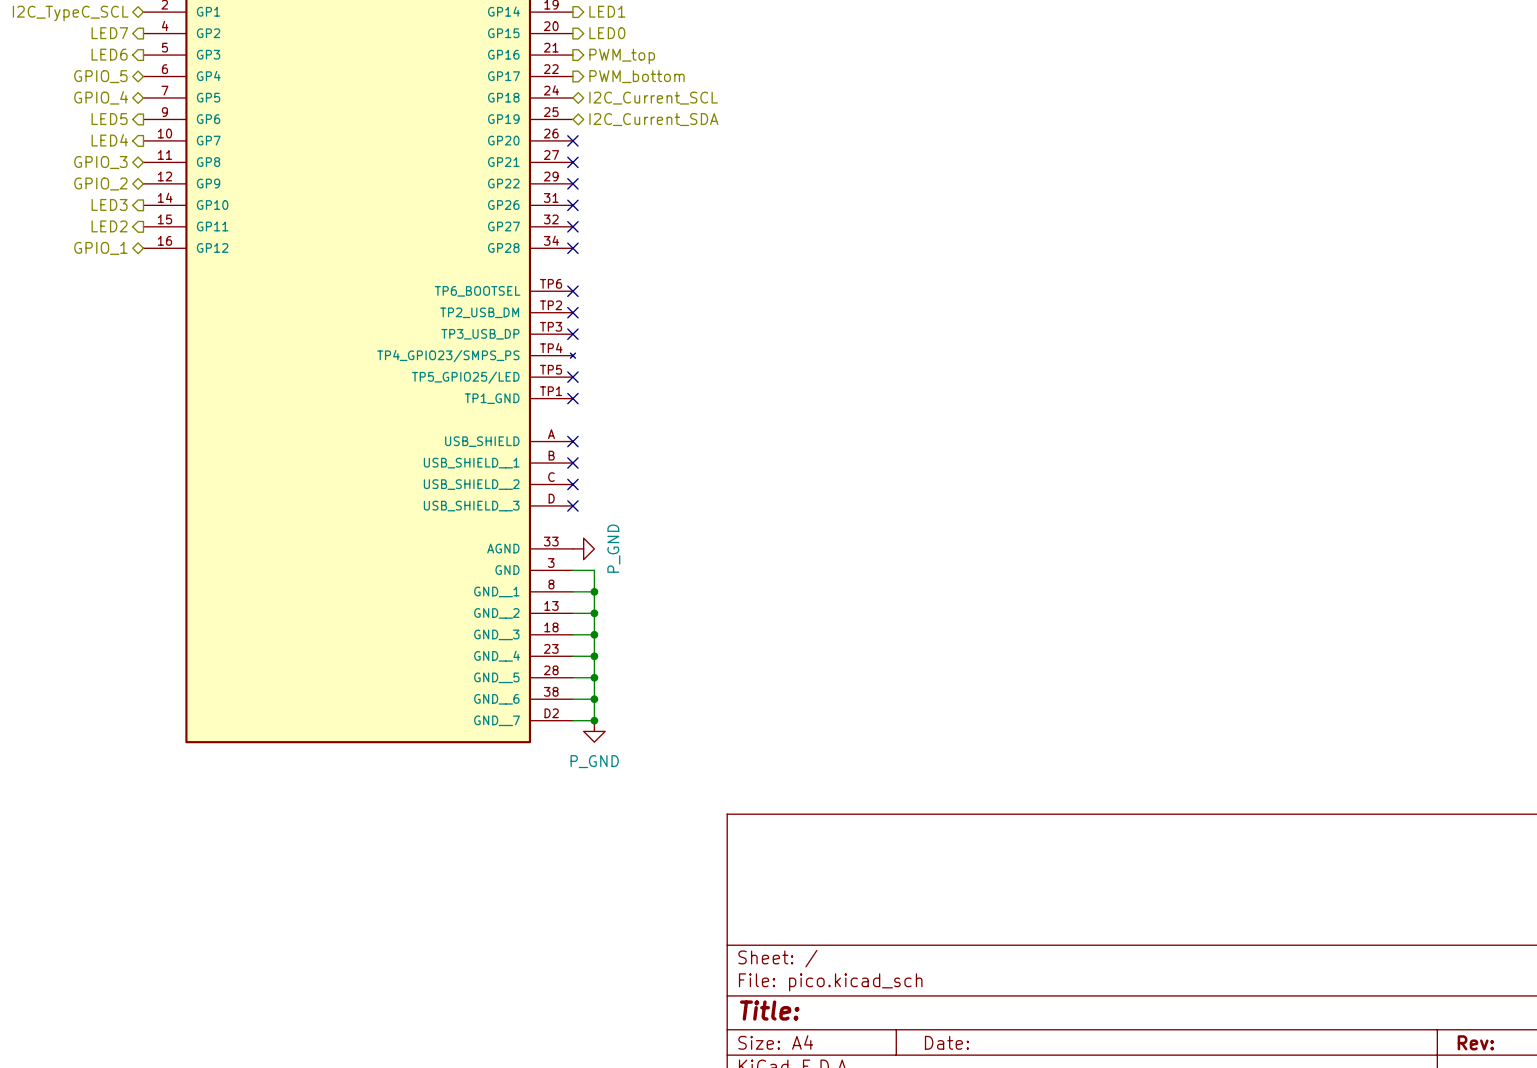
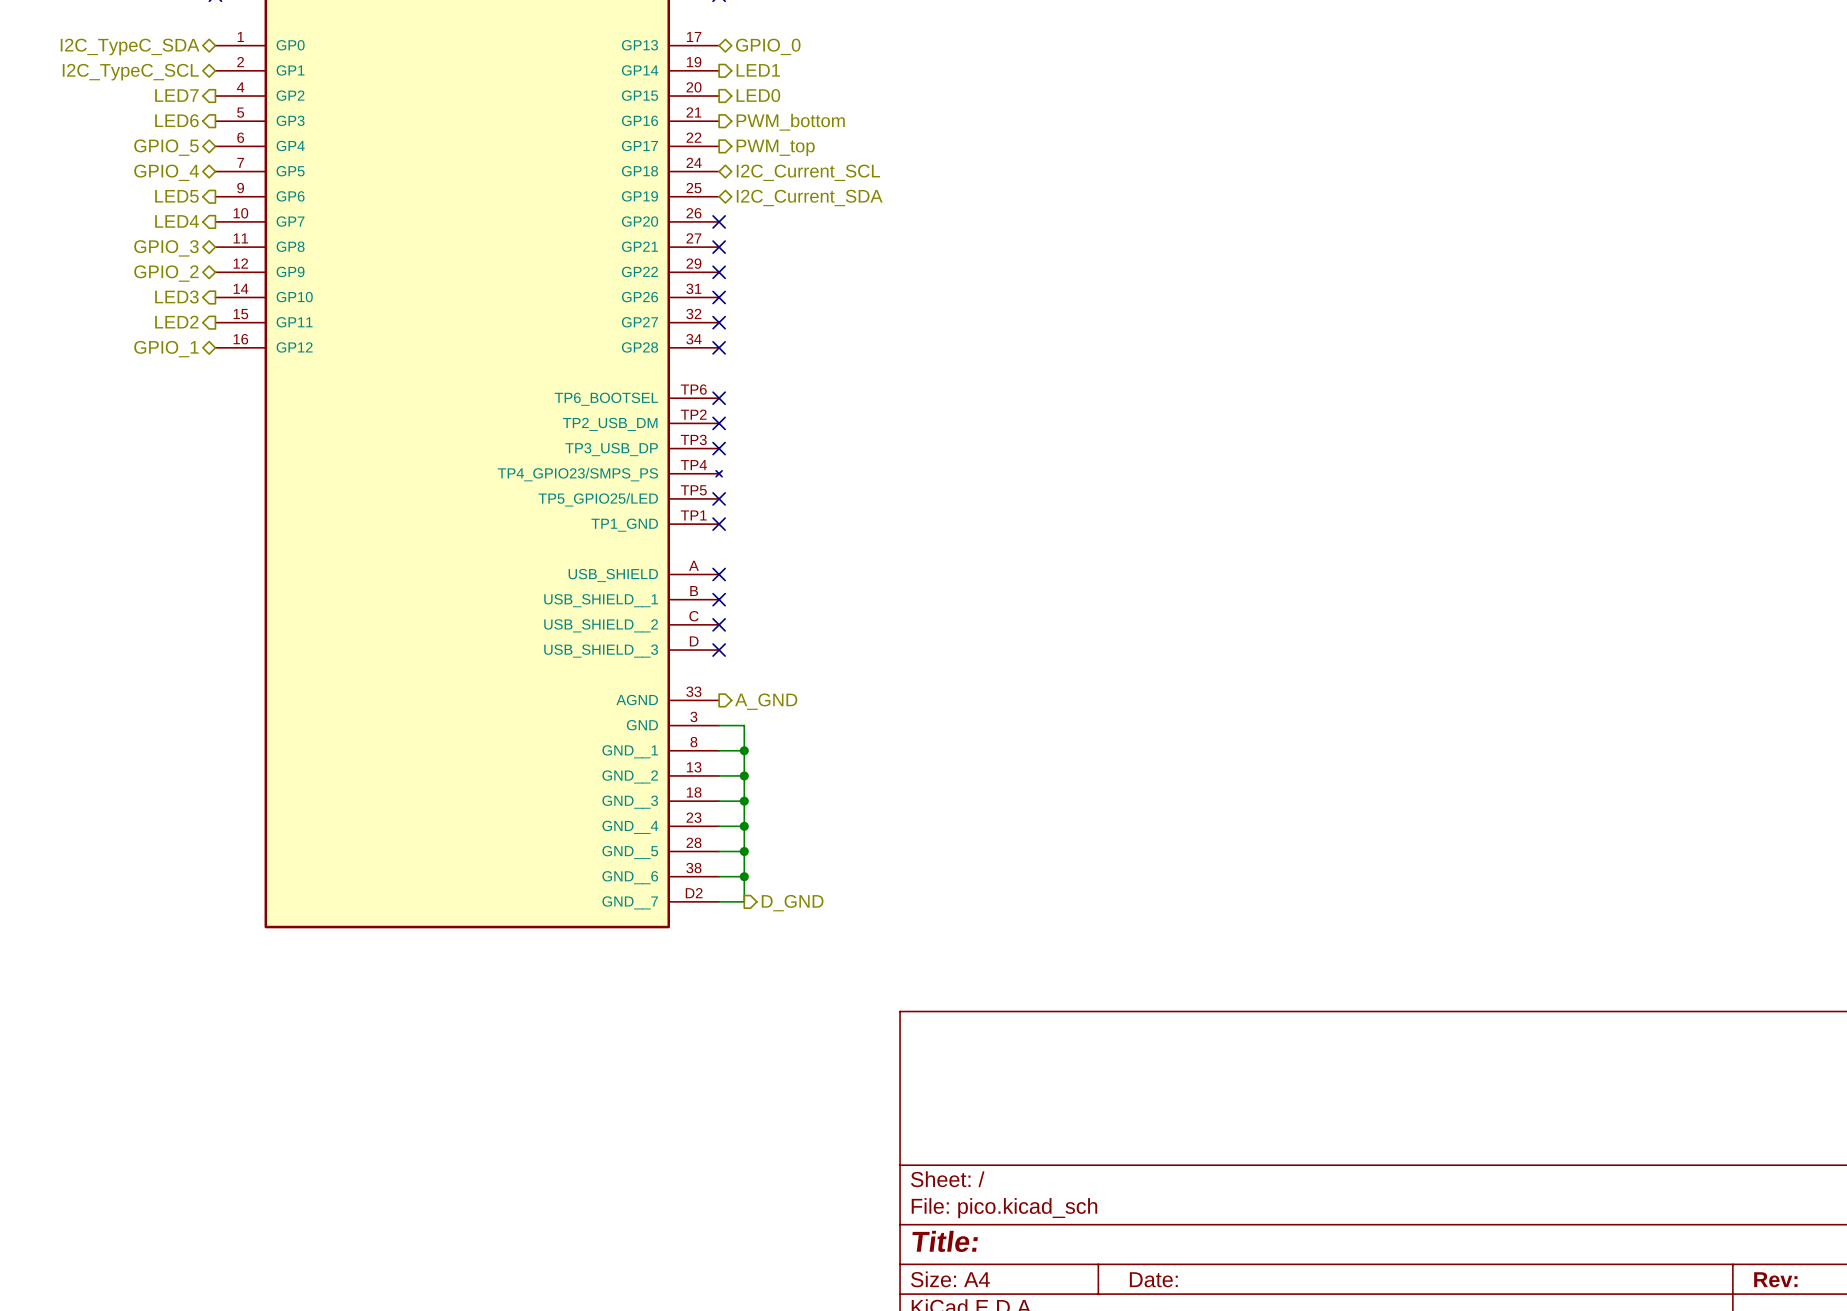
hierarchical label: PWM_top (622, 56) -> PWM_bottom (790, 122)
hierarchical label: PWM_bottom (637, 76) -> PWM_top (775, 147)
power symbol: P_GND (583, 548) -> none
hierarchical label: none -> A_GND (766, 701)
junction: (594, 720) -> none
hierarchical label: none -> D_GND (792, 903)
power symbol: P_GND (594, 731) -> none

